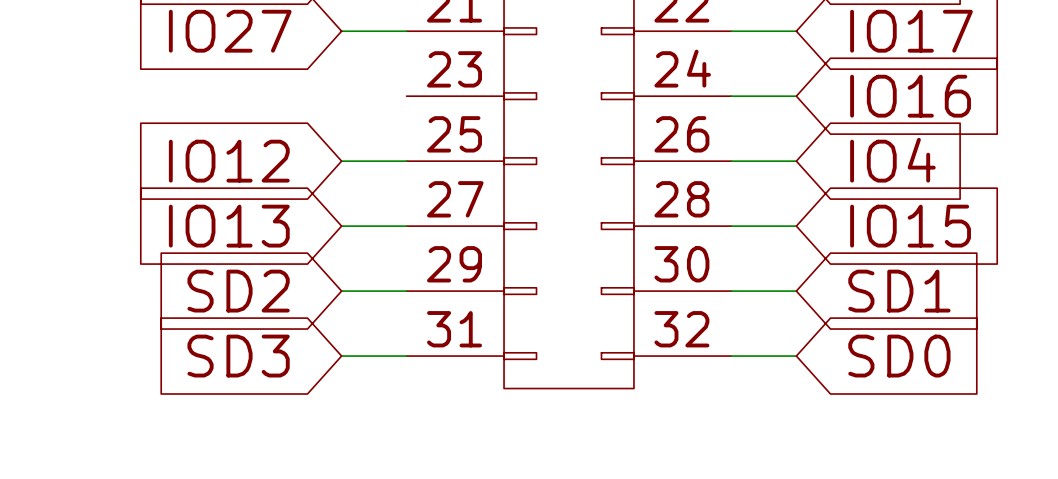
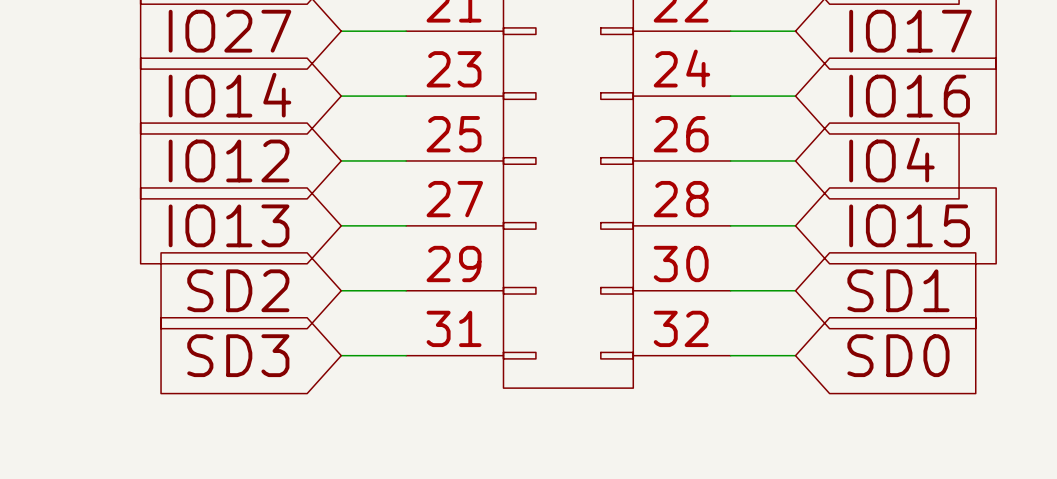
global label: none -> IO14 (229, 95)
wire: none -> (341, 96) (406, 96)

